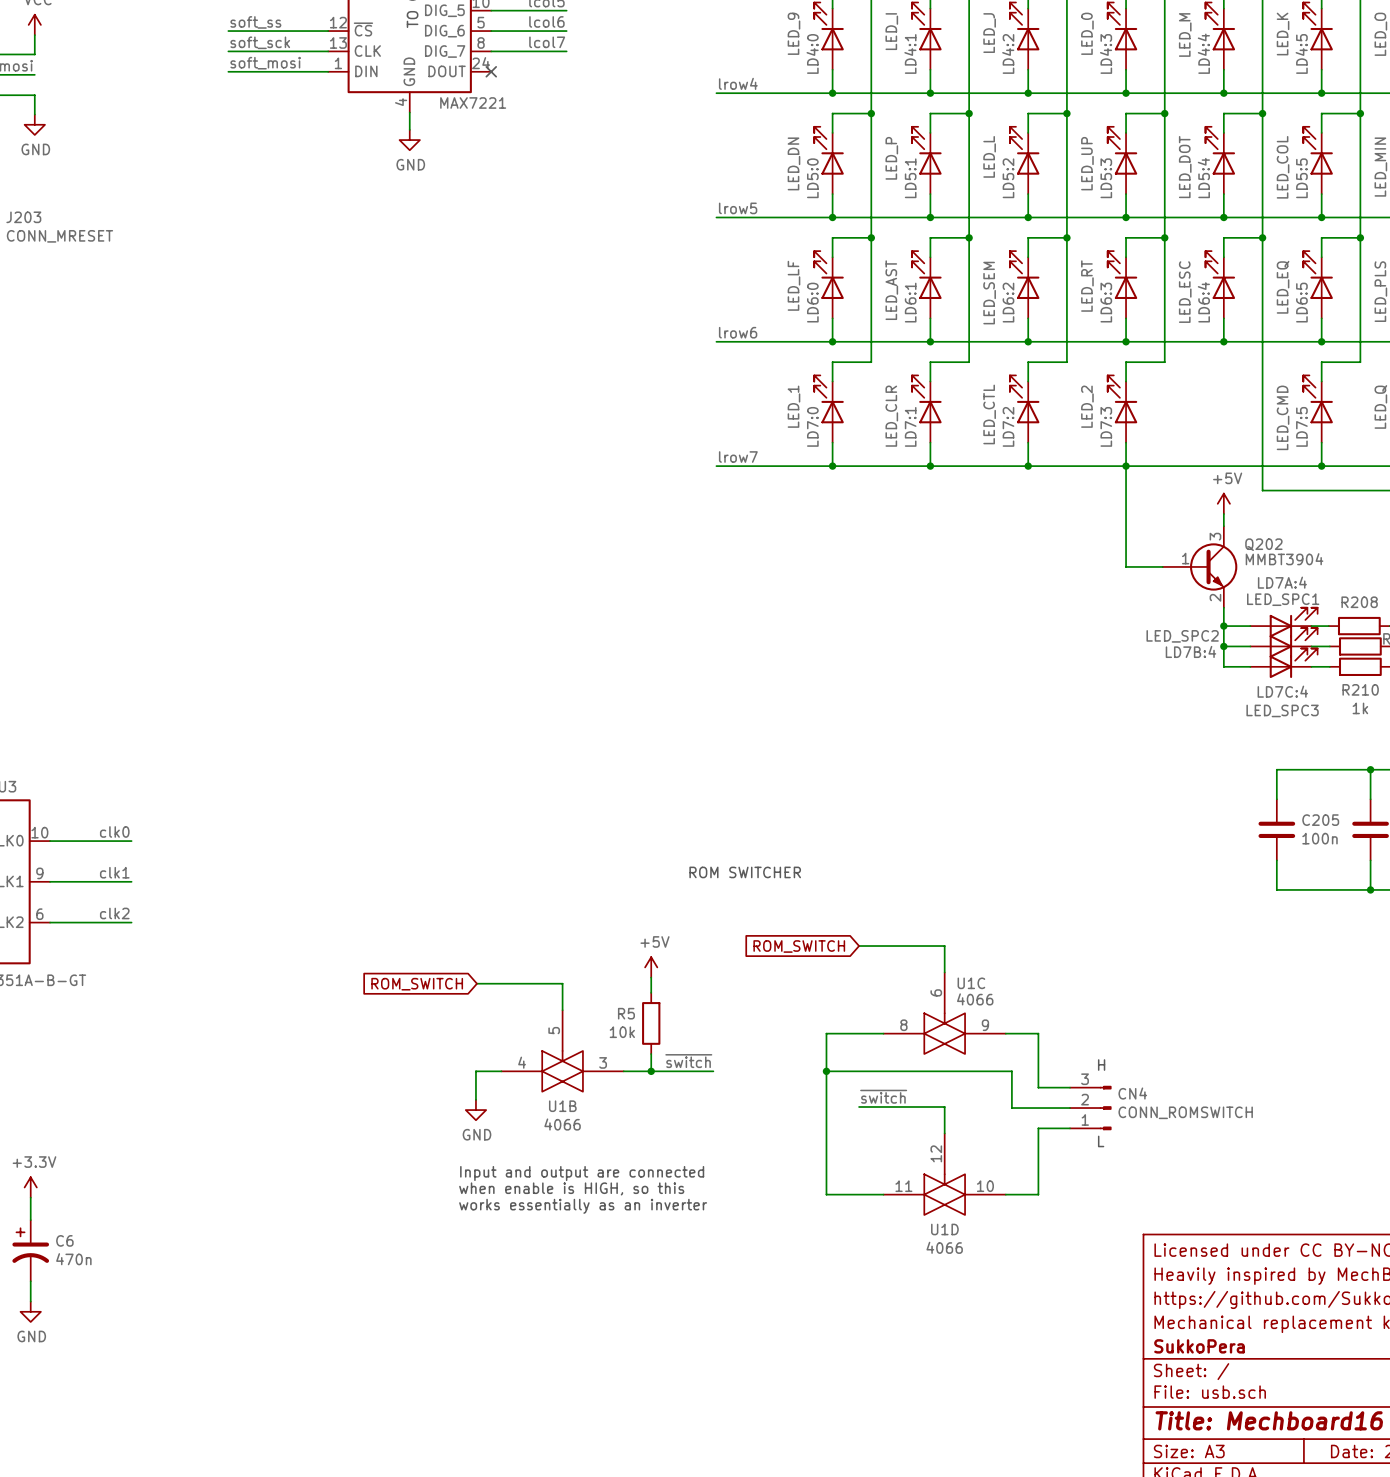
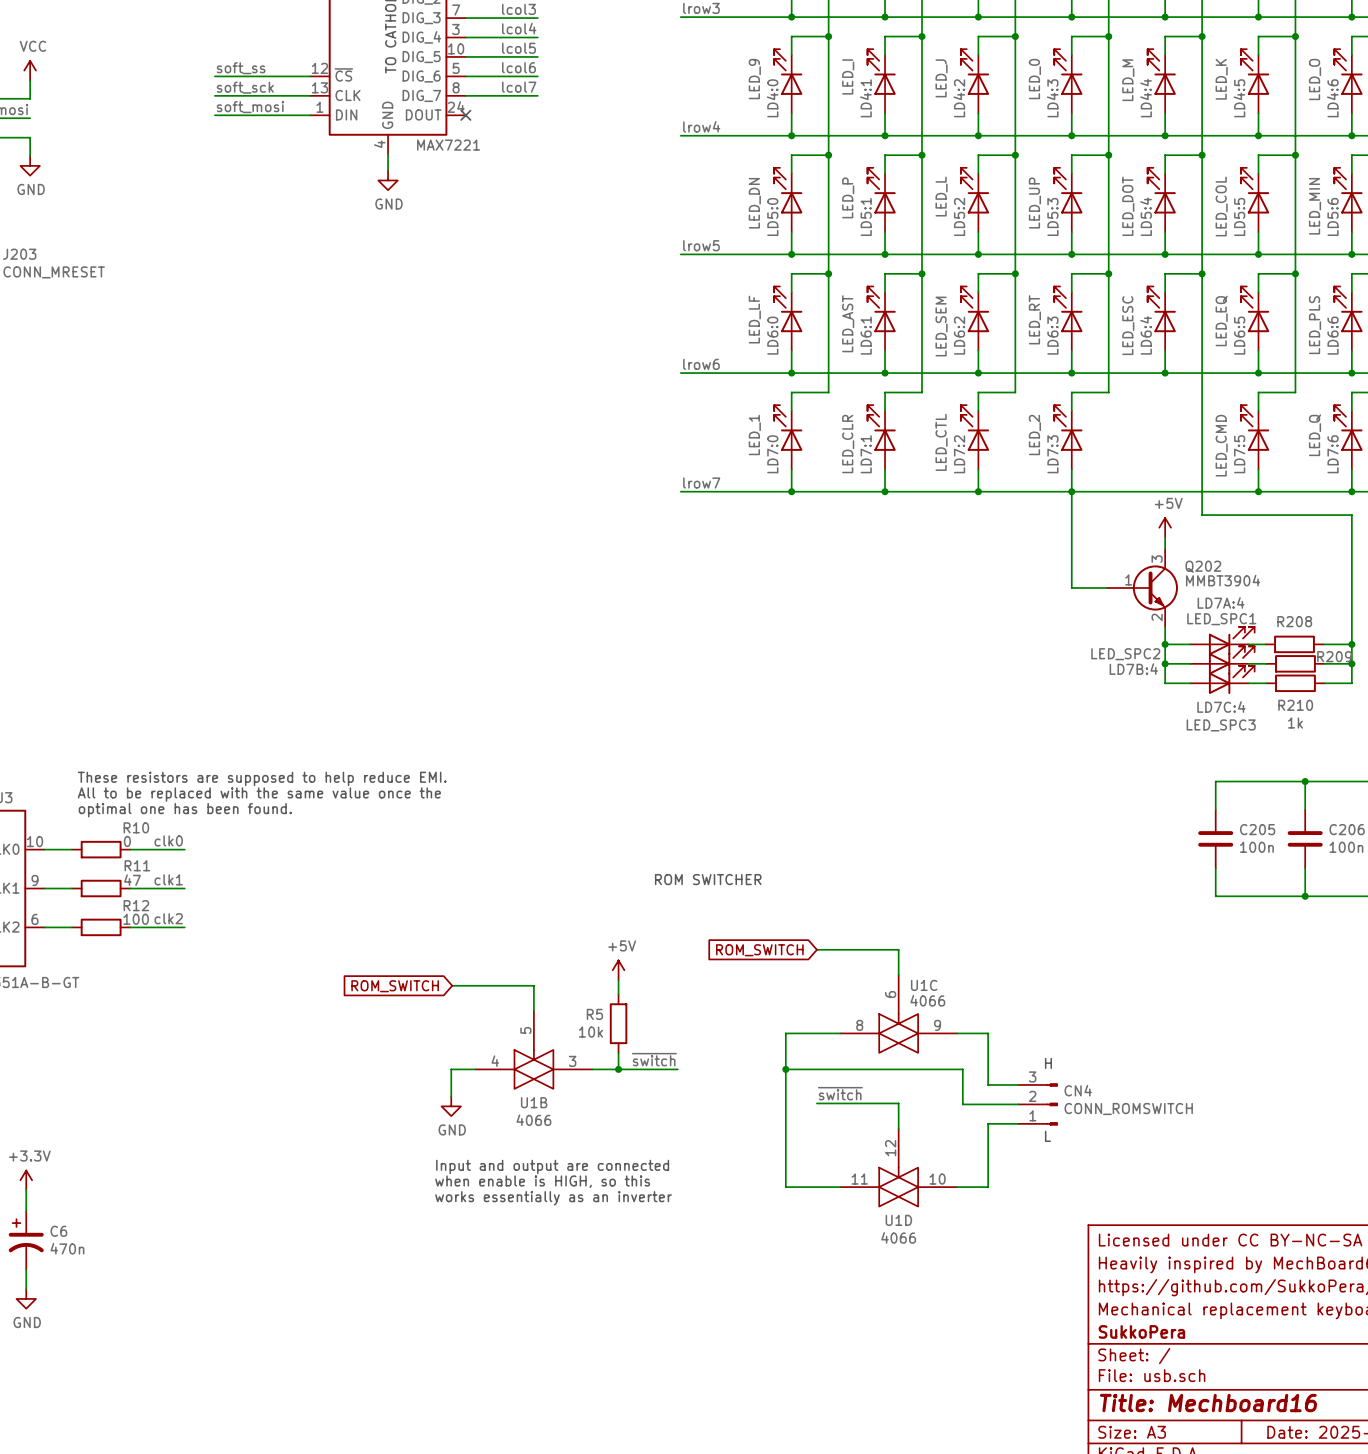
text: none -> These resistors are supposed to help reduce EMI. (262, 778)
text: none -> All to be replaced with the same value once the (259, 794)
text: none -> optimal one has been found. (185, 810)
label position: clk0 (114, 831) -> clk0 (168, 840)
wire: (78, 841) (131, 841) -> none
R10: none -> 0 (101, 849)
wire: none -> (130, 849) (184, 849)
label position: clk1 (114, 872) -> clk1 (168, 879)
wire: (78, 881) (131, 881) -> none
R11: none -> 47 (101, 888)
wire: none -> (130, 888) (184, 888)
label position: clk2 (114, 913) -> clk2 (168, 918)
wire: (78, 922) (131, 922) -> none
R12: none -> 100 (101, 927)
wire: none -> (130, 927) (184, 927)

